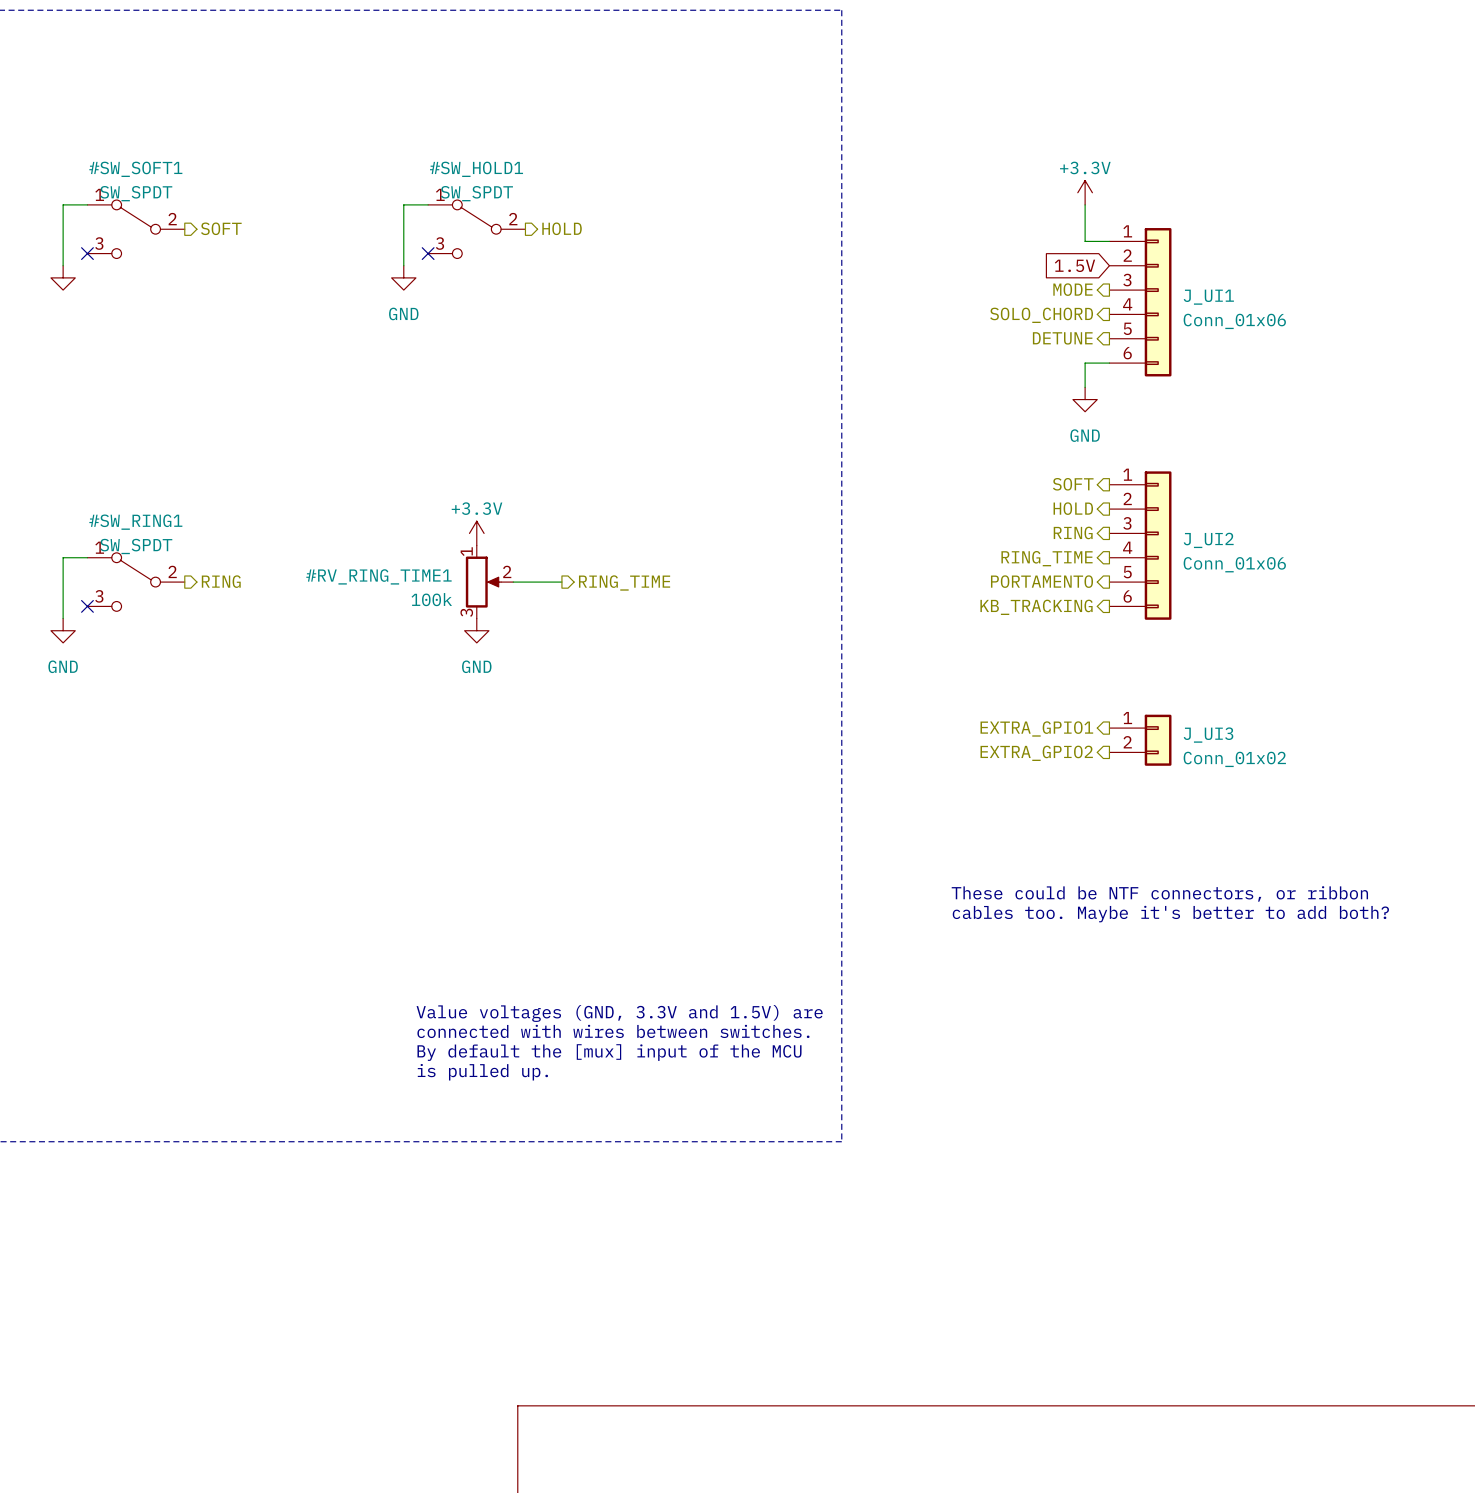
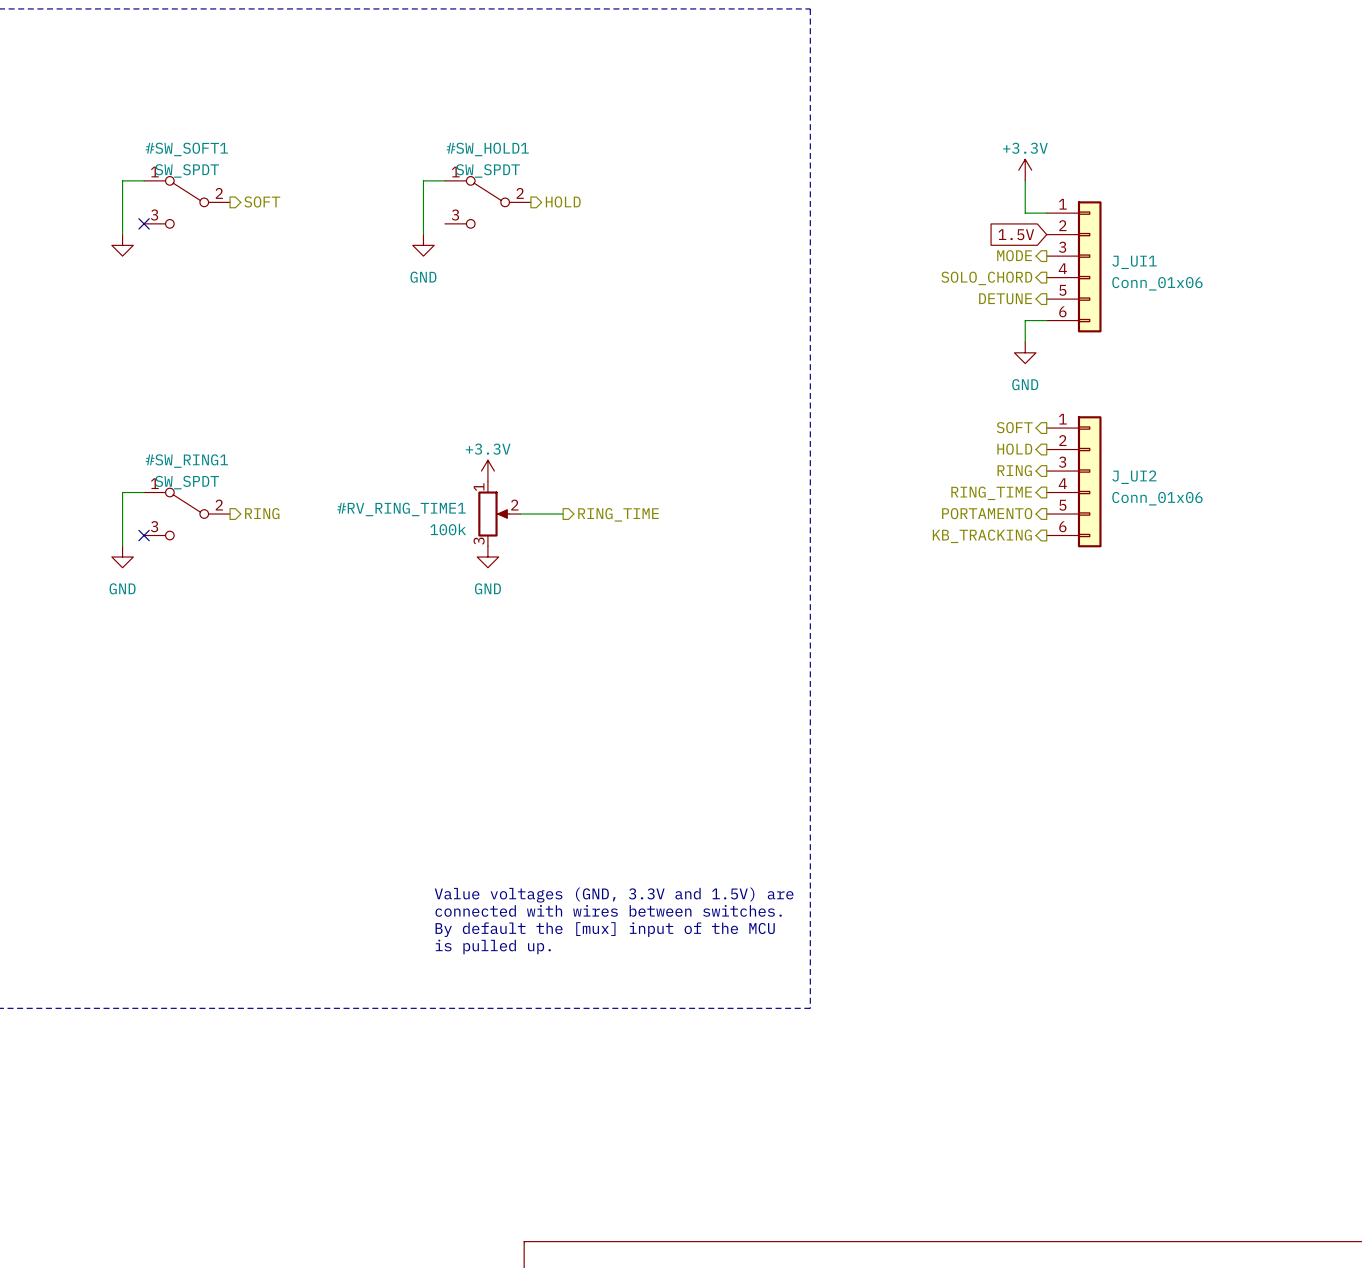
no-connect mark: (428, 253) -> none
hierarchical label: EXTRA_GPIO1 (1036, 728) -> none
J_UI3: Conn_01x02 (1140, 740) -> none
hierarchical label: EXTRA_GPIO2 (1036, 753) -> none
text: These could be NTF connectors, or ribbon (1159, 893) -> none
text: cables too. Maybe it's better to add both? (1170, 914) -> none

